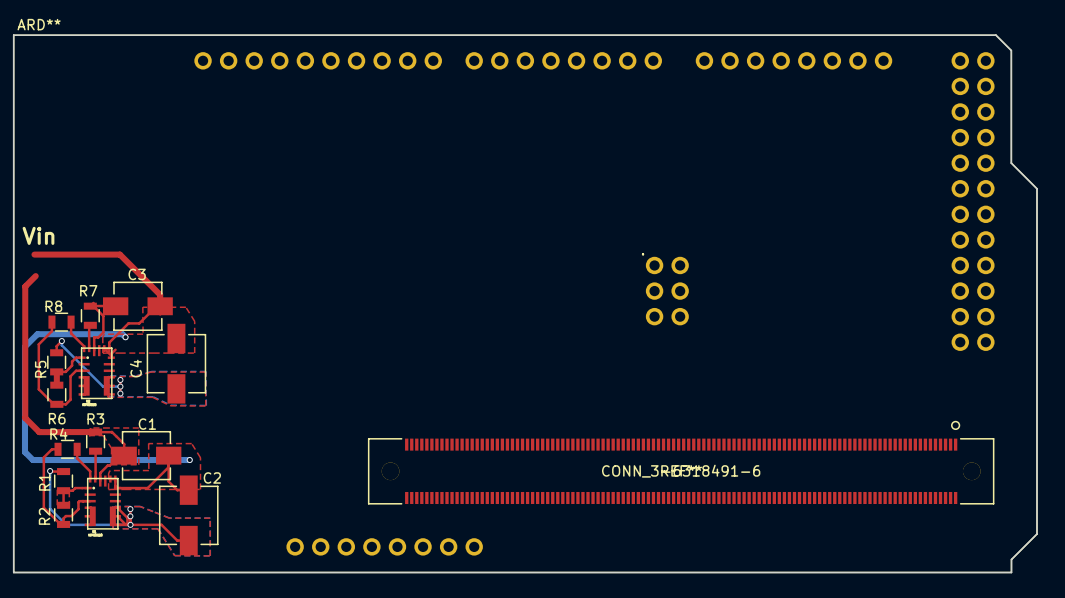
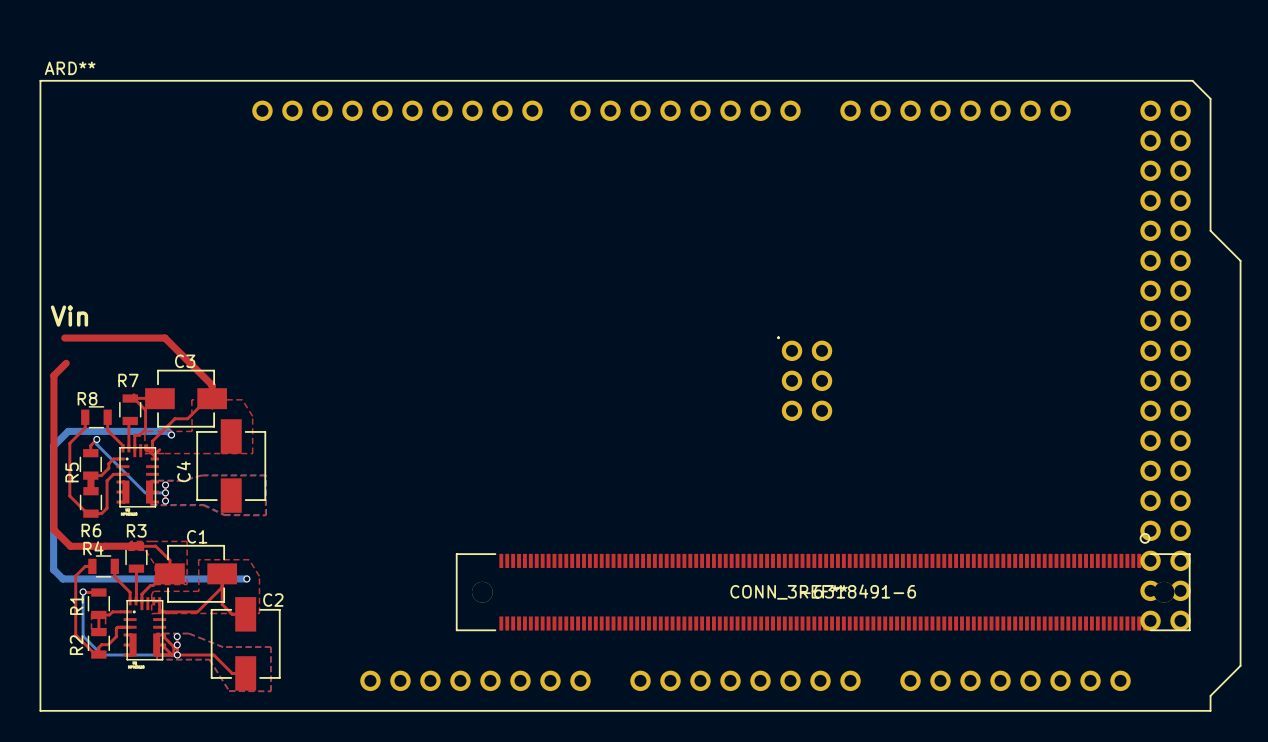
ARD** footprint: [12, 34, 1038, 574] -> [39, 79, 1242, 712]
board edge: (13, 35) (13, 572) (1011, 572) (1011, 559) (1036, 534) (1036, 188) (1011, 163) (1011, 50) (995, 35) (13, 35) -> none

